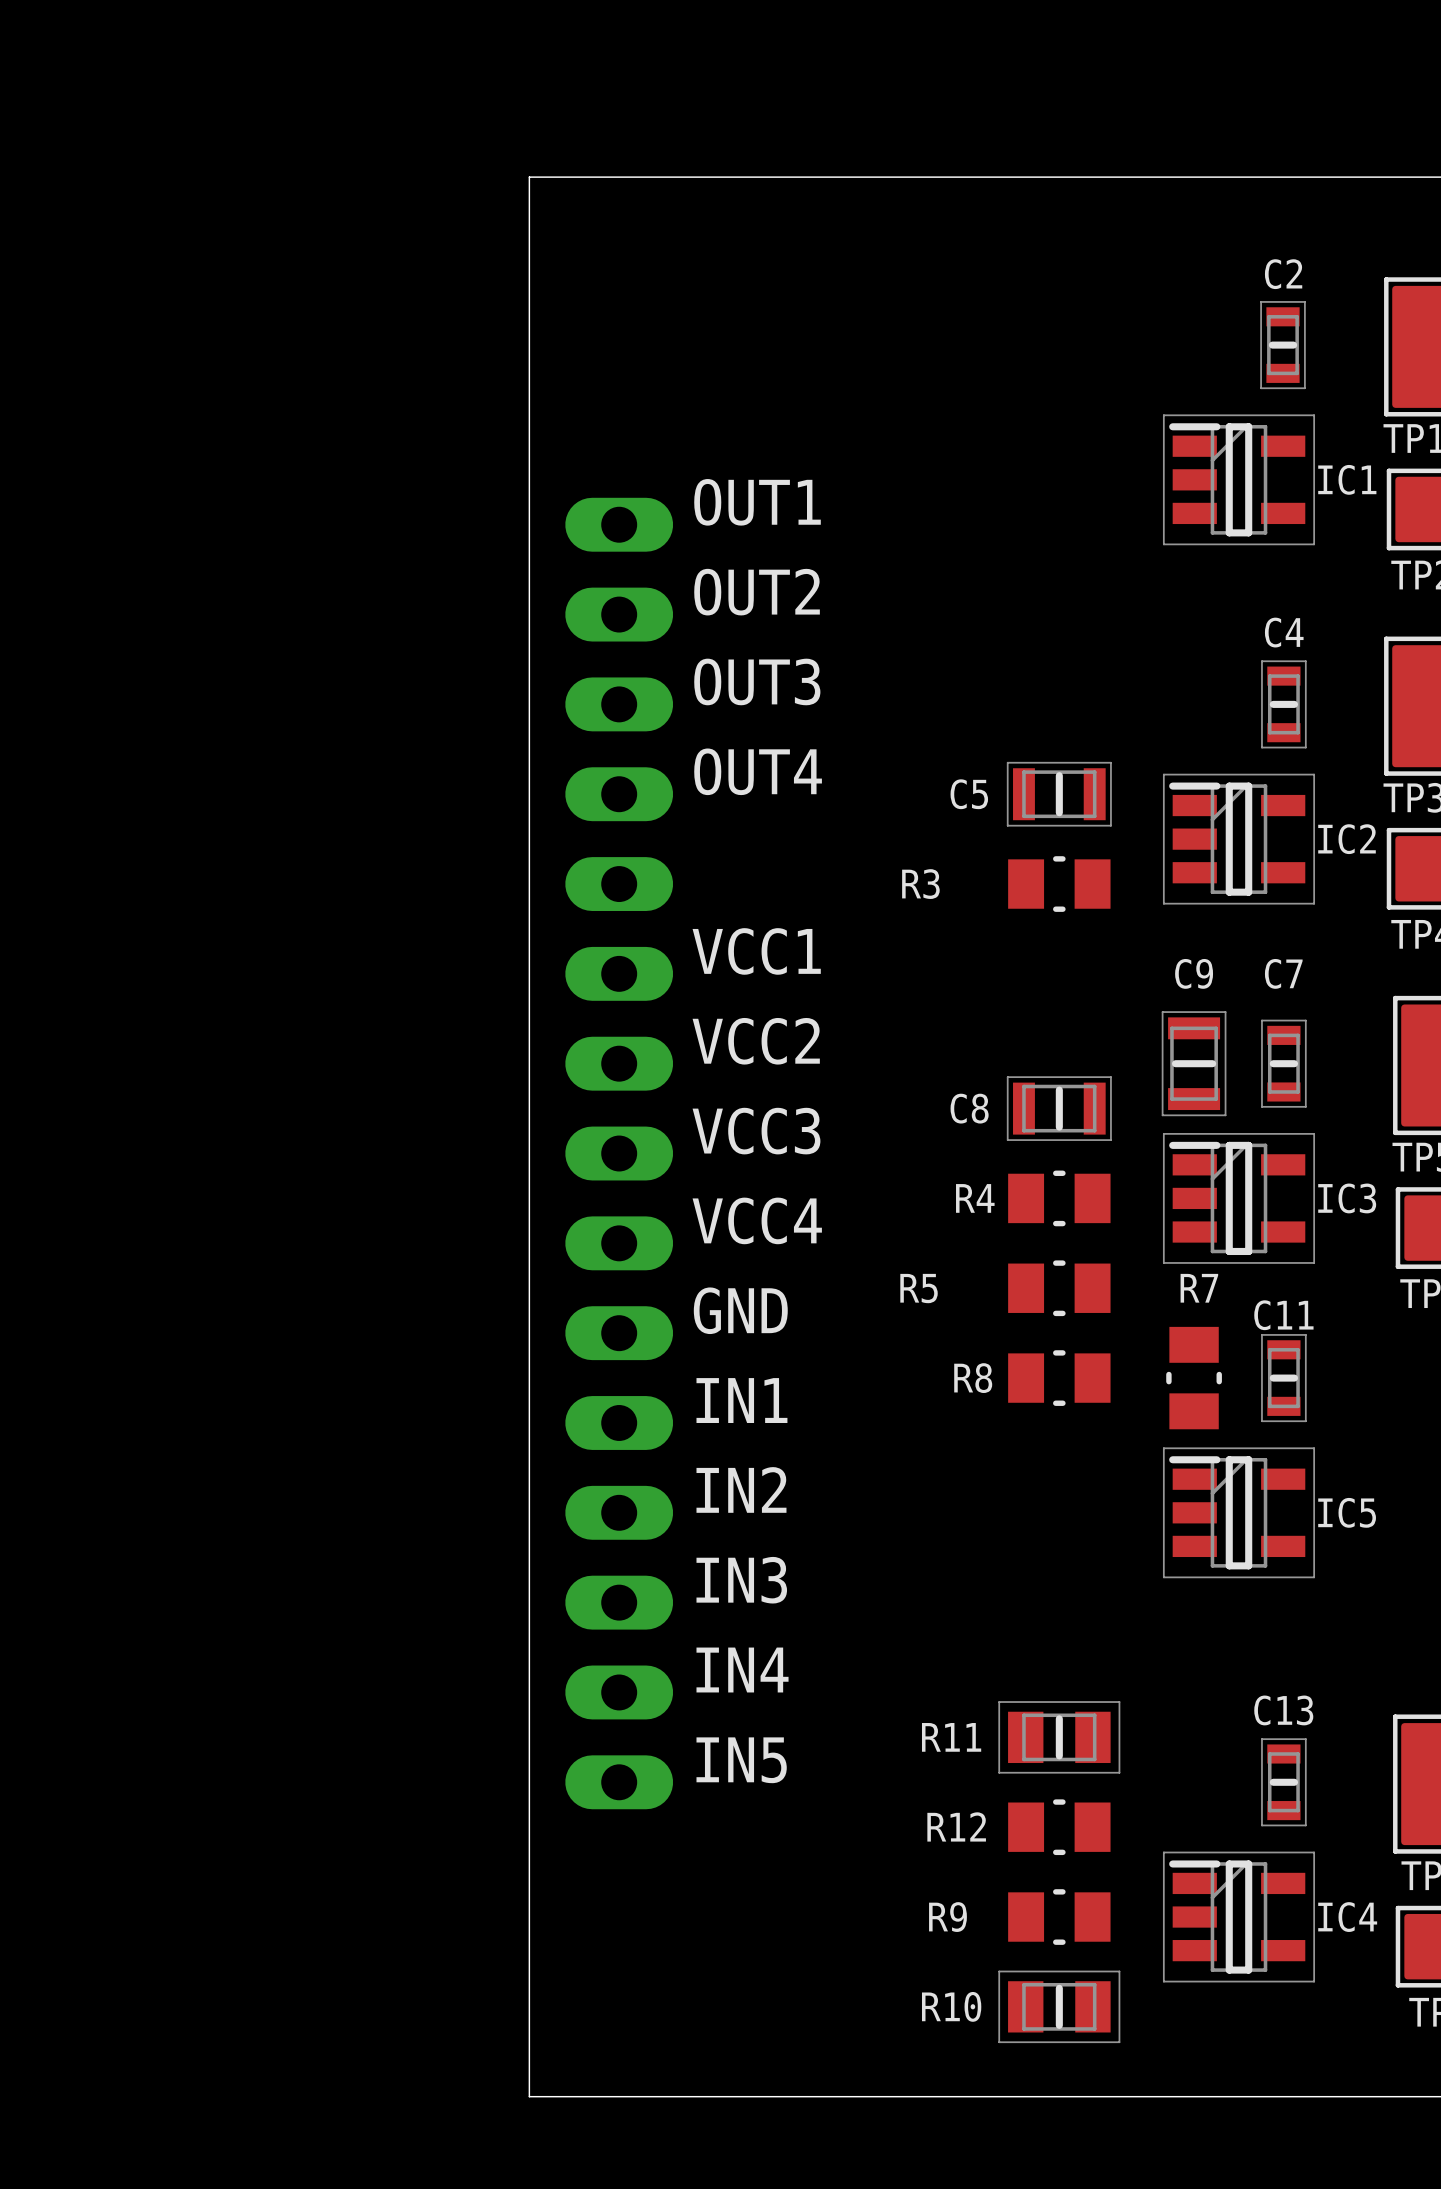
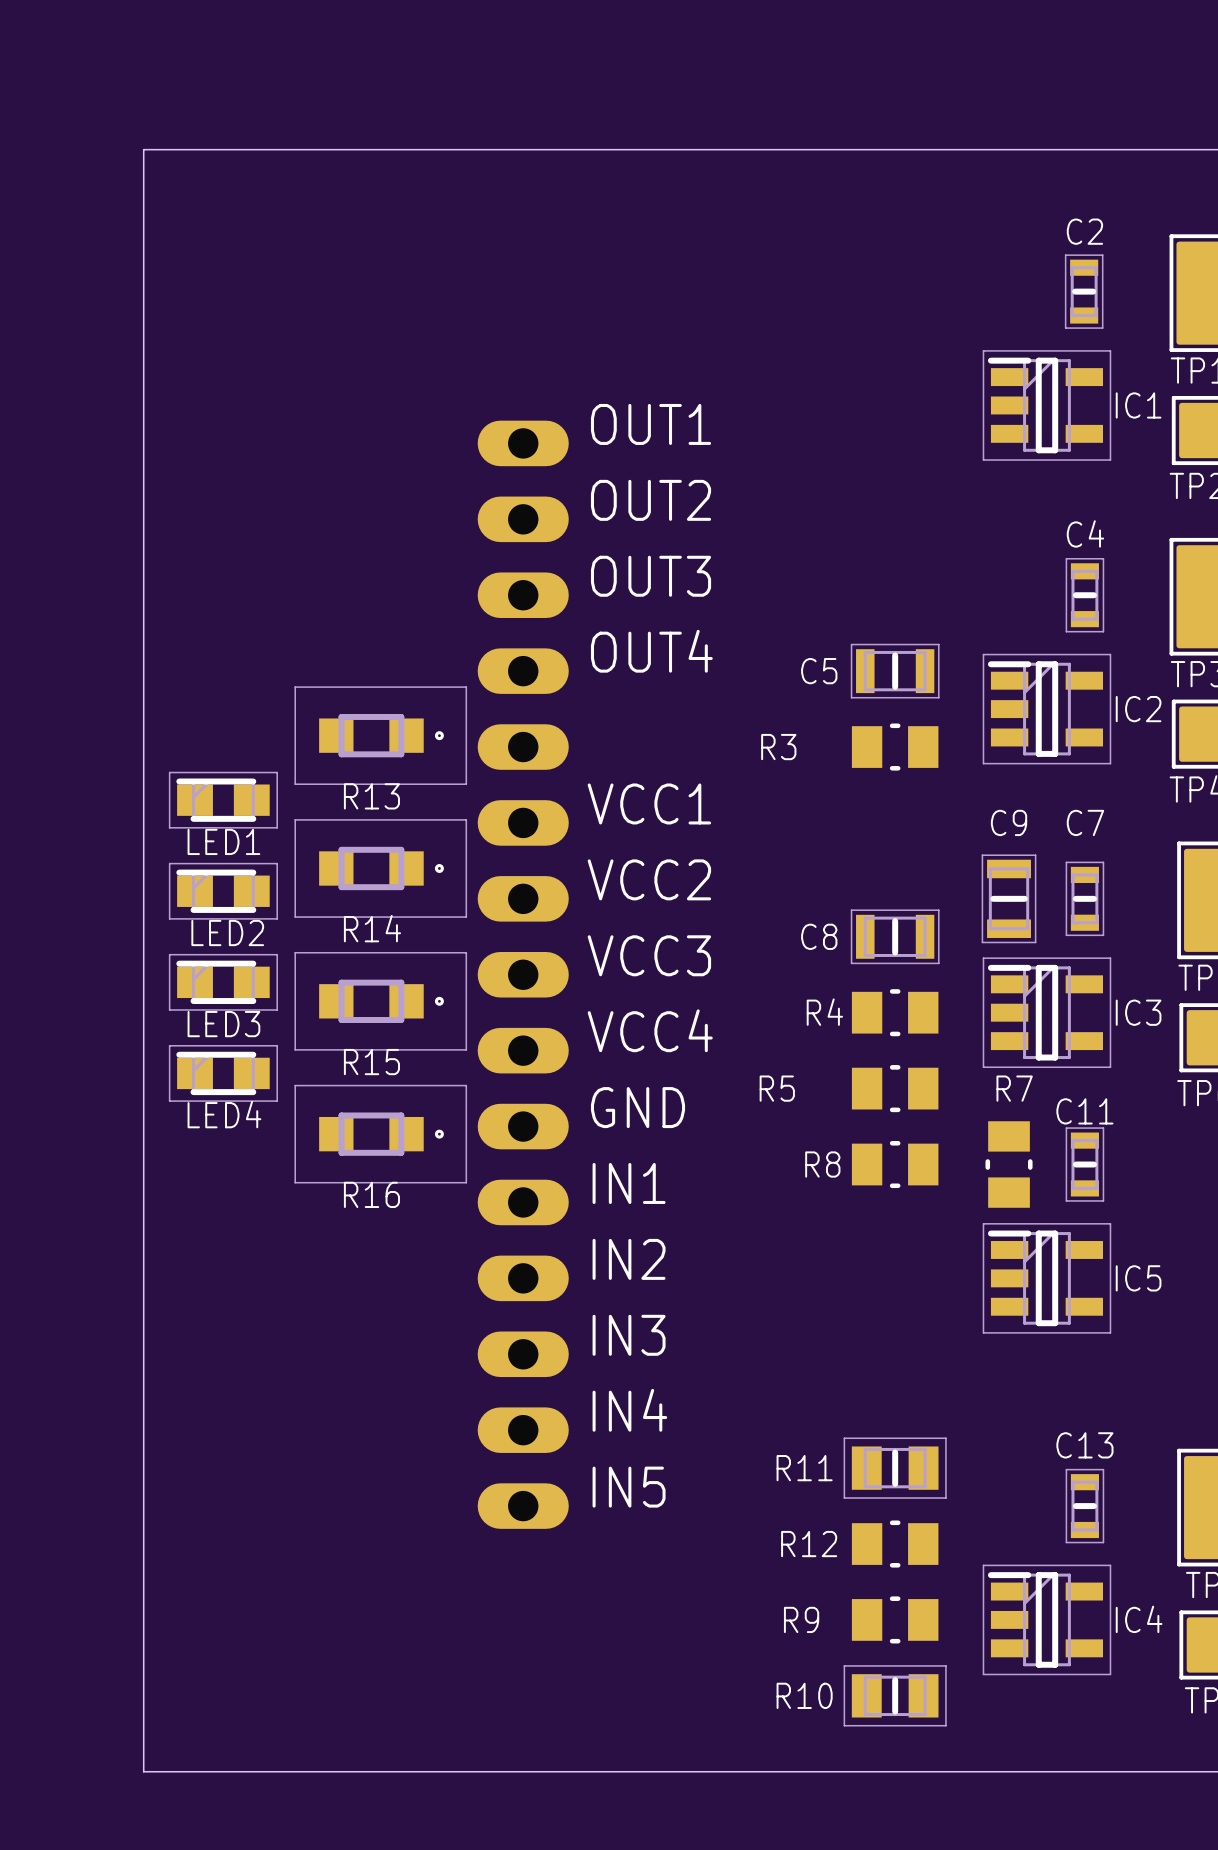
board edge: (529, 177) (529, 2096) -> (447, 149) (143, 149) (143, 1771) (447, 1771)
R13: none -> (380, 735)
LED1: none -> (223, 800)
R14: none -> (380, 868)
LED2: none -> (223, 891)
LED3: none -> (223, 982)
R15: none -> (380, 1001)
LED4: none -> (223, 1073)
R16: none -> (380, 1134)

